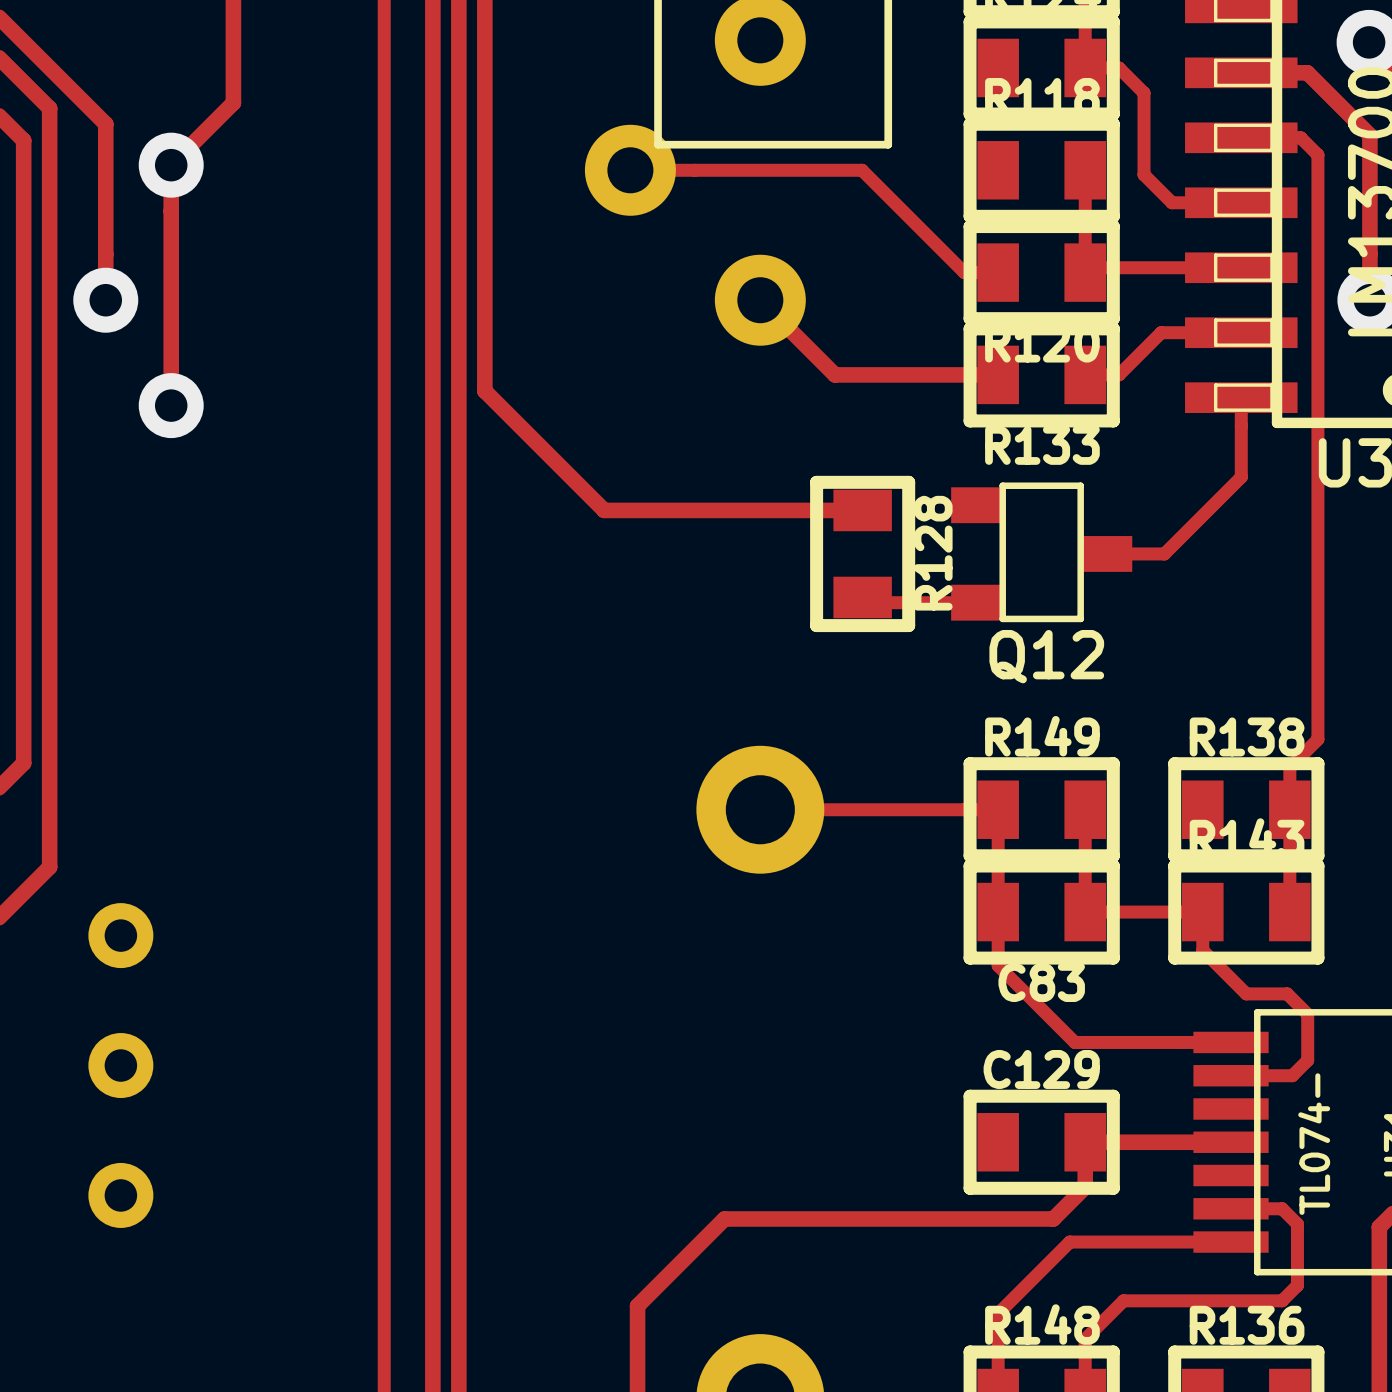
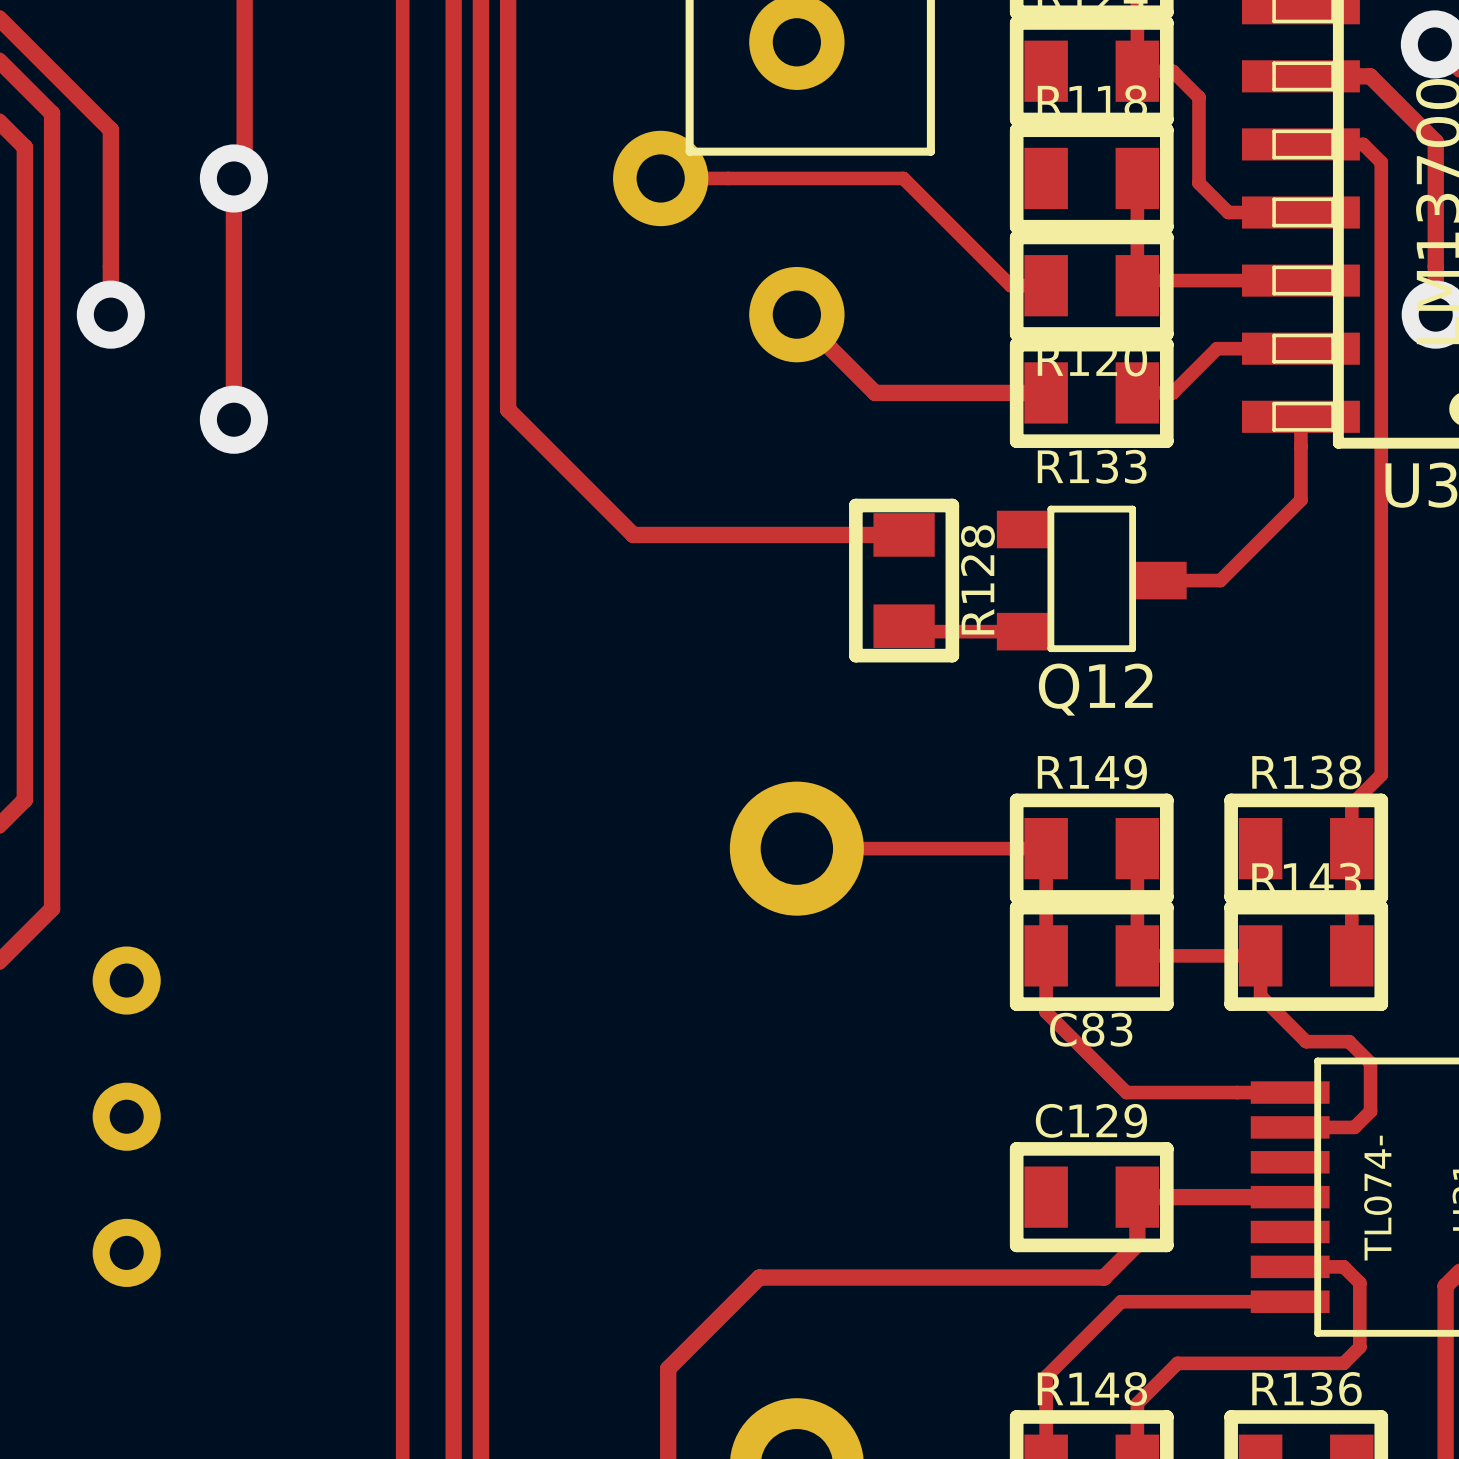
track: (233, 102) (171, 165) (171, 405) -> (244, 107) (244, 167) (233, 178) (233, 419)
via position: (171, 165) -> (233, 178)
via position: (171, 405) -> (233, 419)

